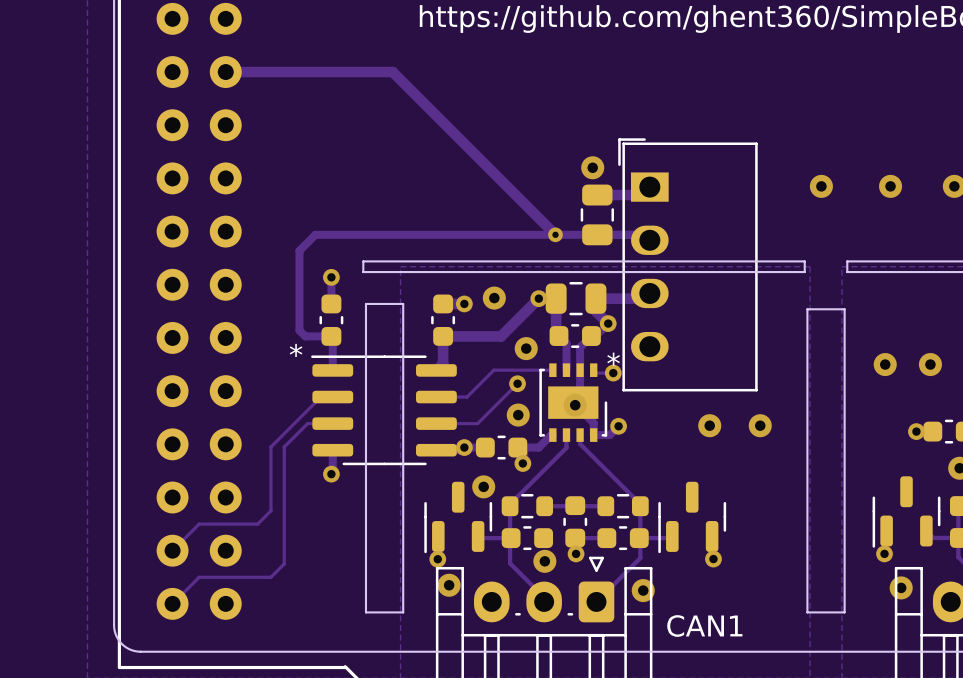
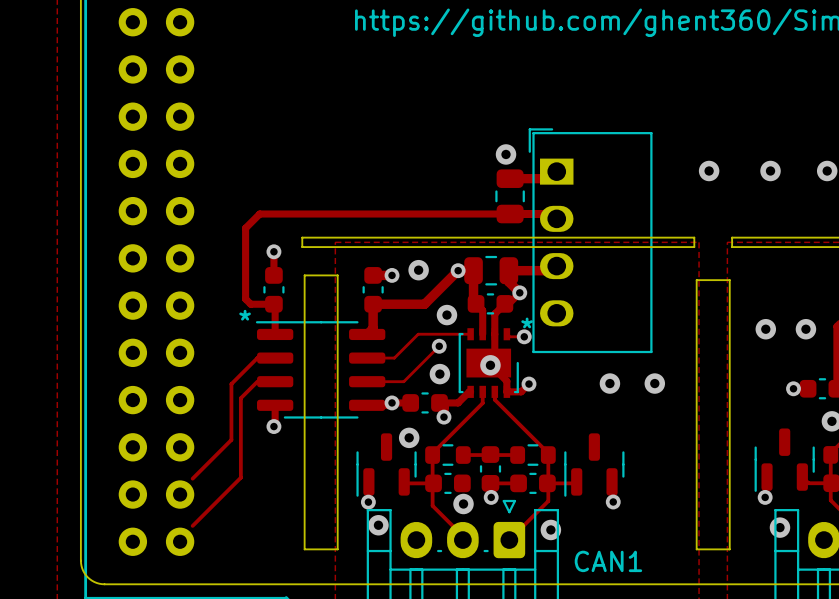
track: (225, 72) (392, 72) (555, 234) -> none
via: (555, 234) -> none
track: (320, 397) (270, 446) (270, 510) (257, 524) (199, 524) (172, 550) -> (264, 358) (257, 358) (231, 384) (231, 439) (192, 478)
track: (312, 423) (307, 423) (284, 446) (284, 563) (270, 577) (199, 577) (172, 603) -> (257, 381) (240, 398) (240, 477) (192, 525)

